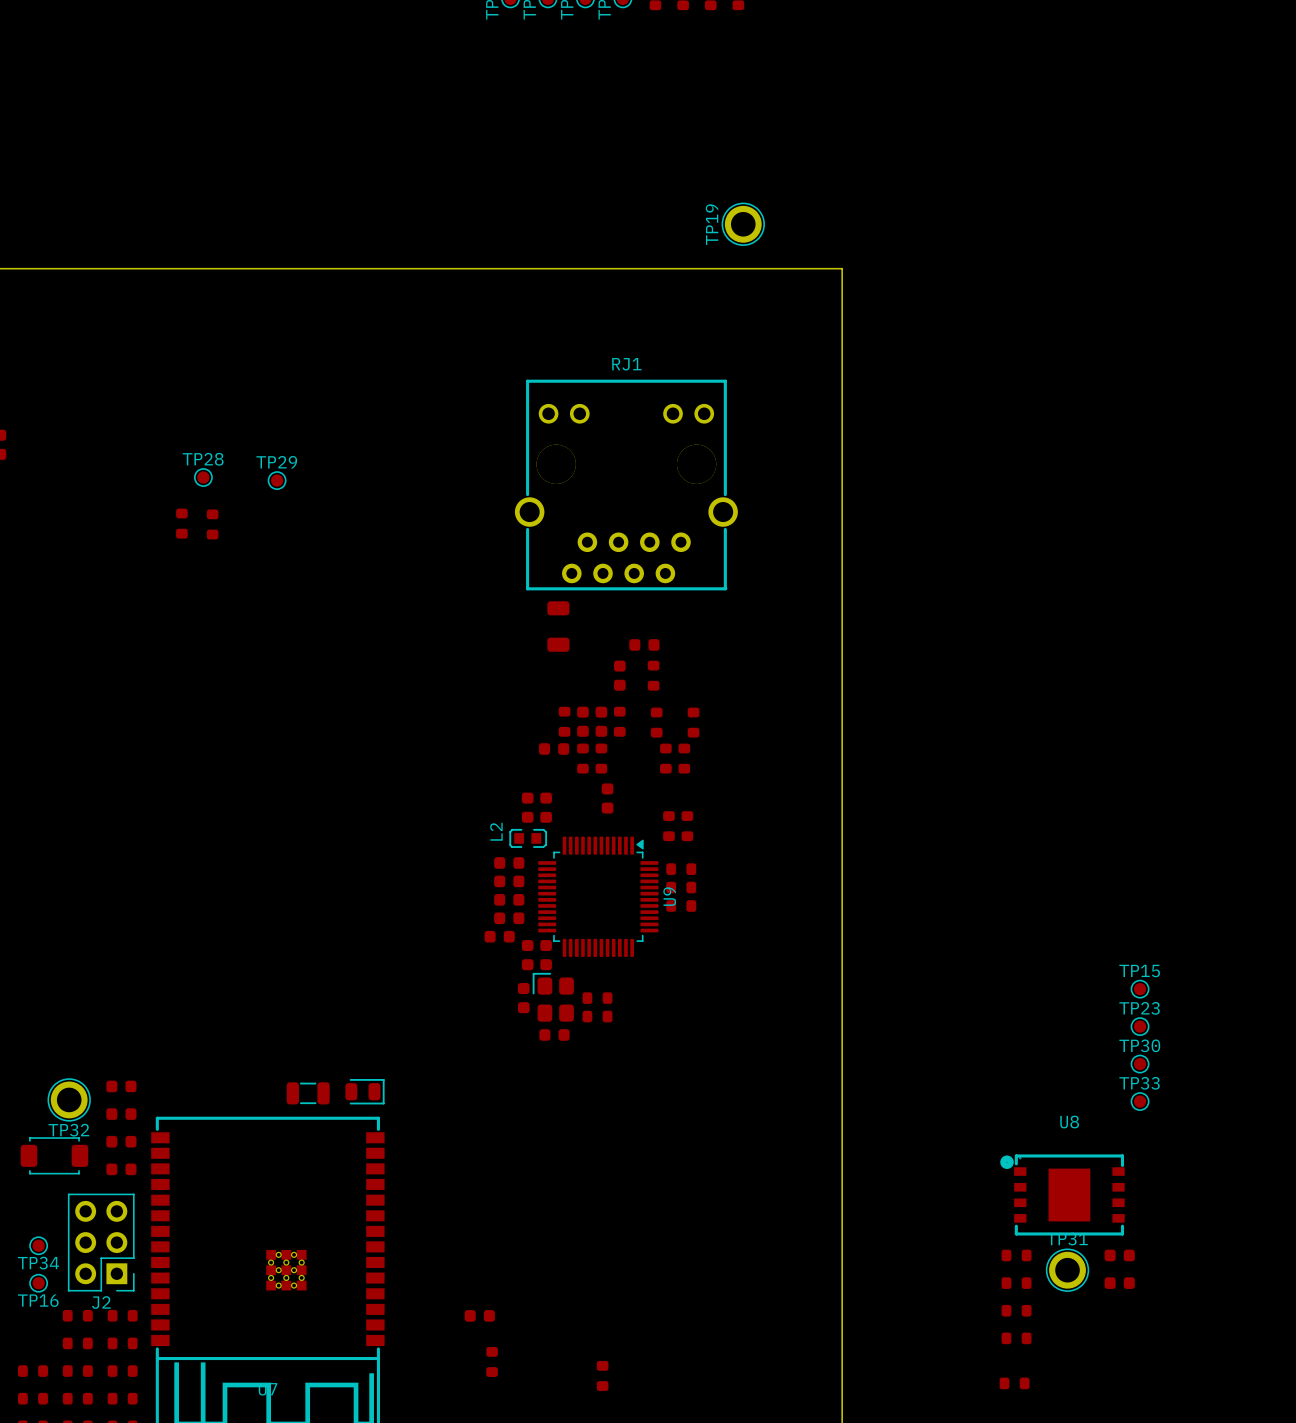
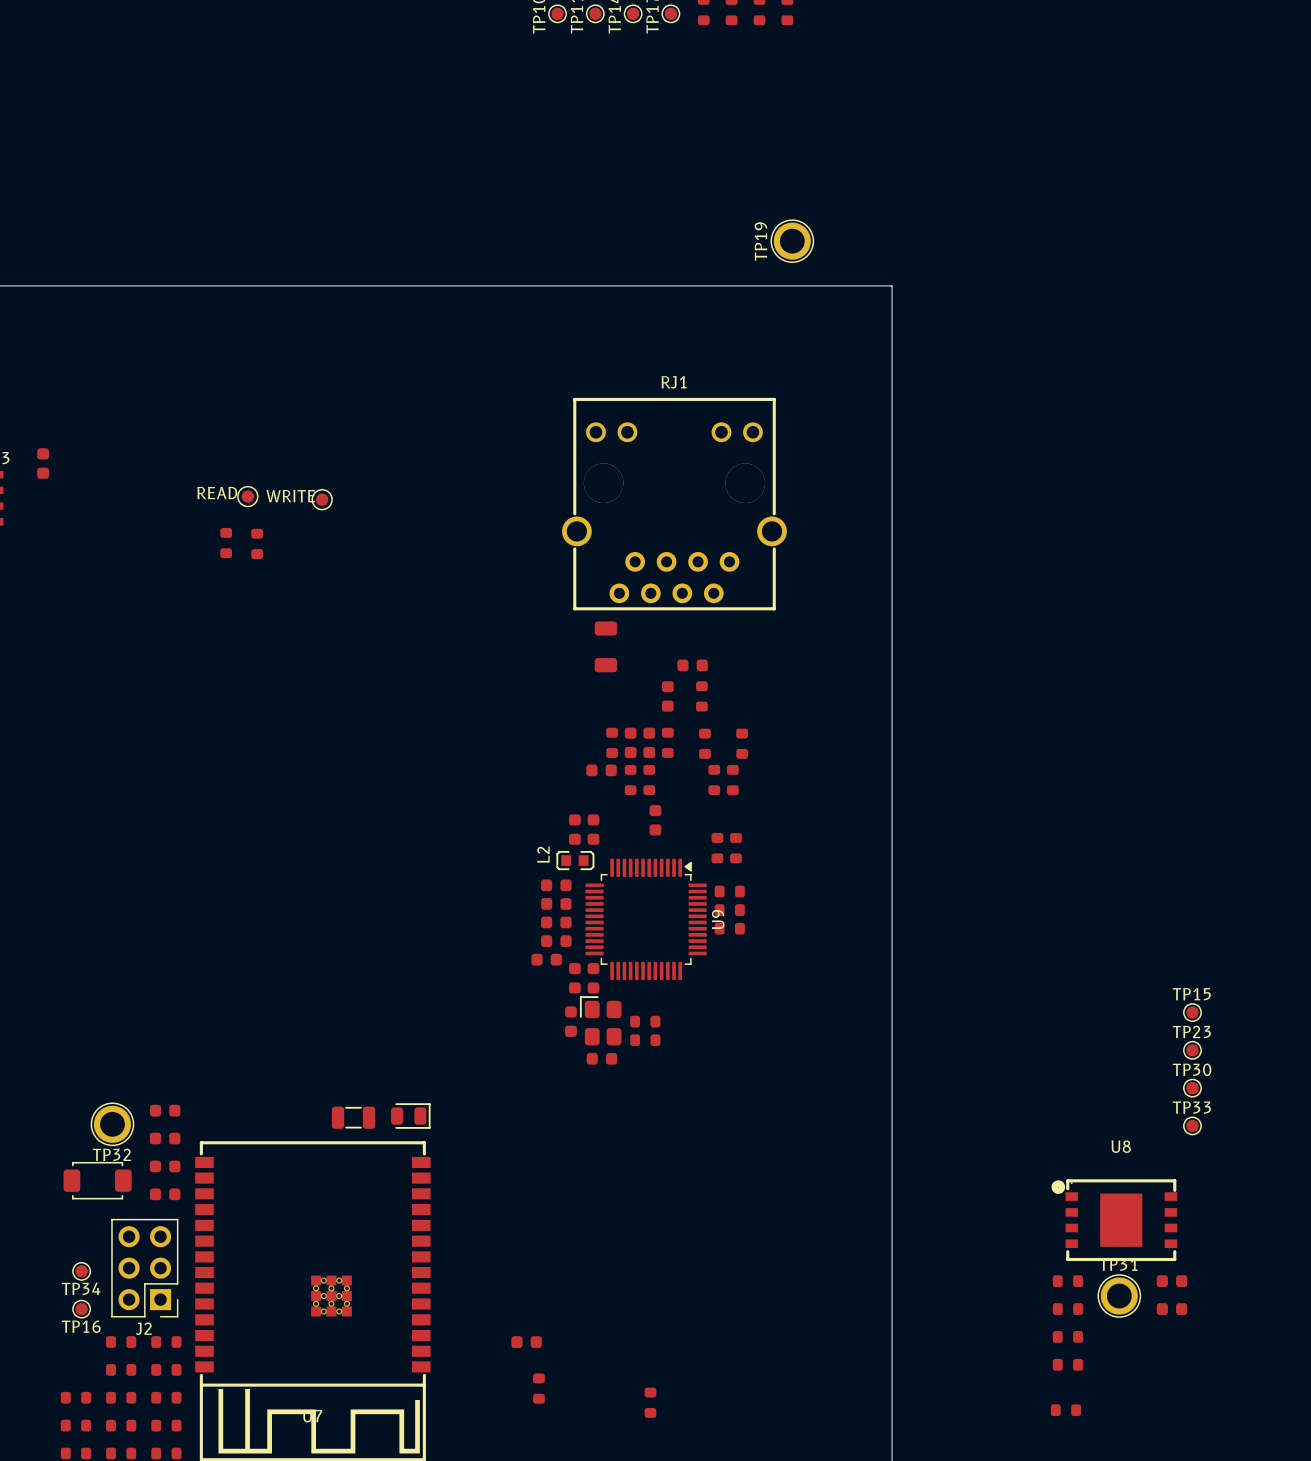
TP28: (203, 477) -> none
part: none -> READ (247, 496)
TP29: (277, 480) -> none
part: none -> WRITE (322, 499)

